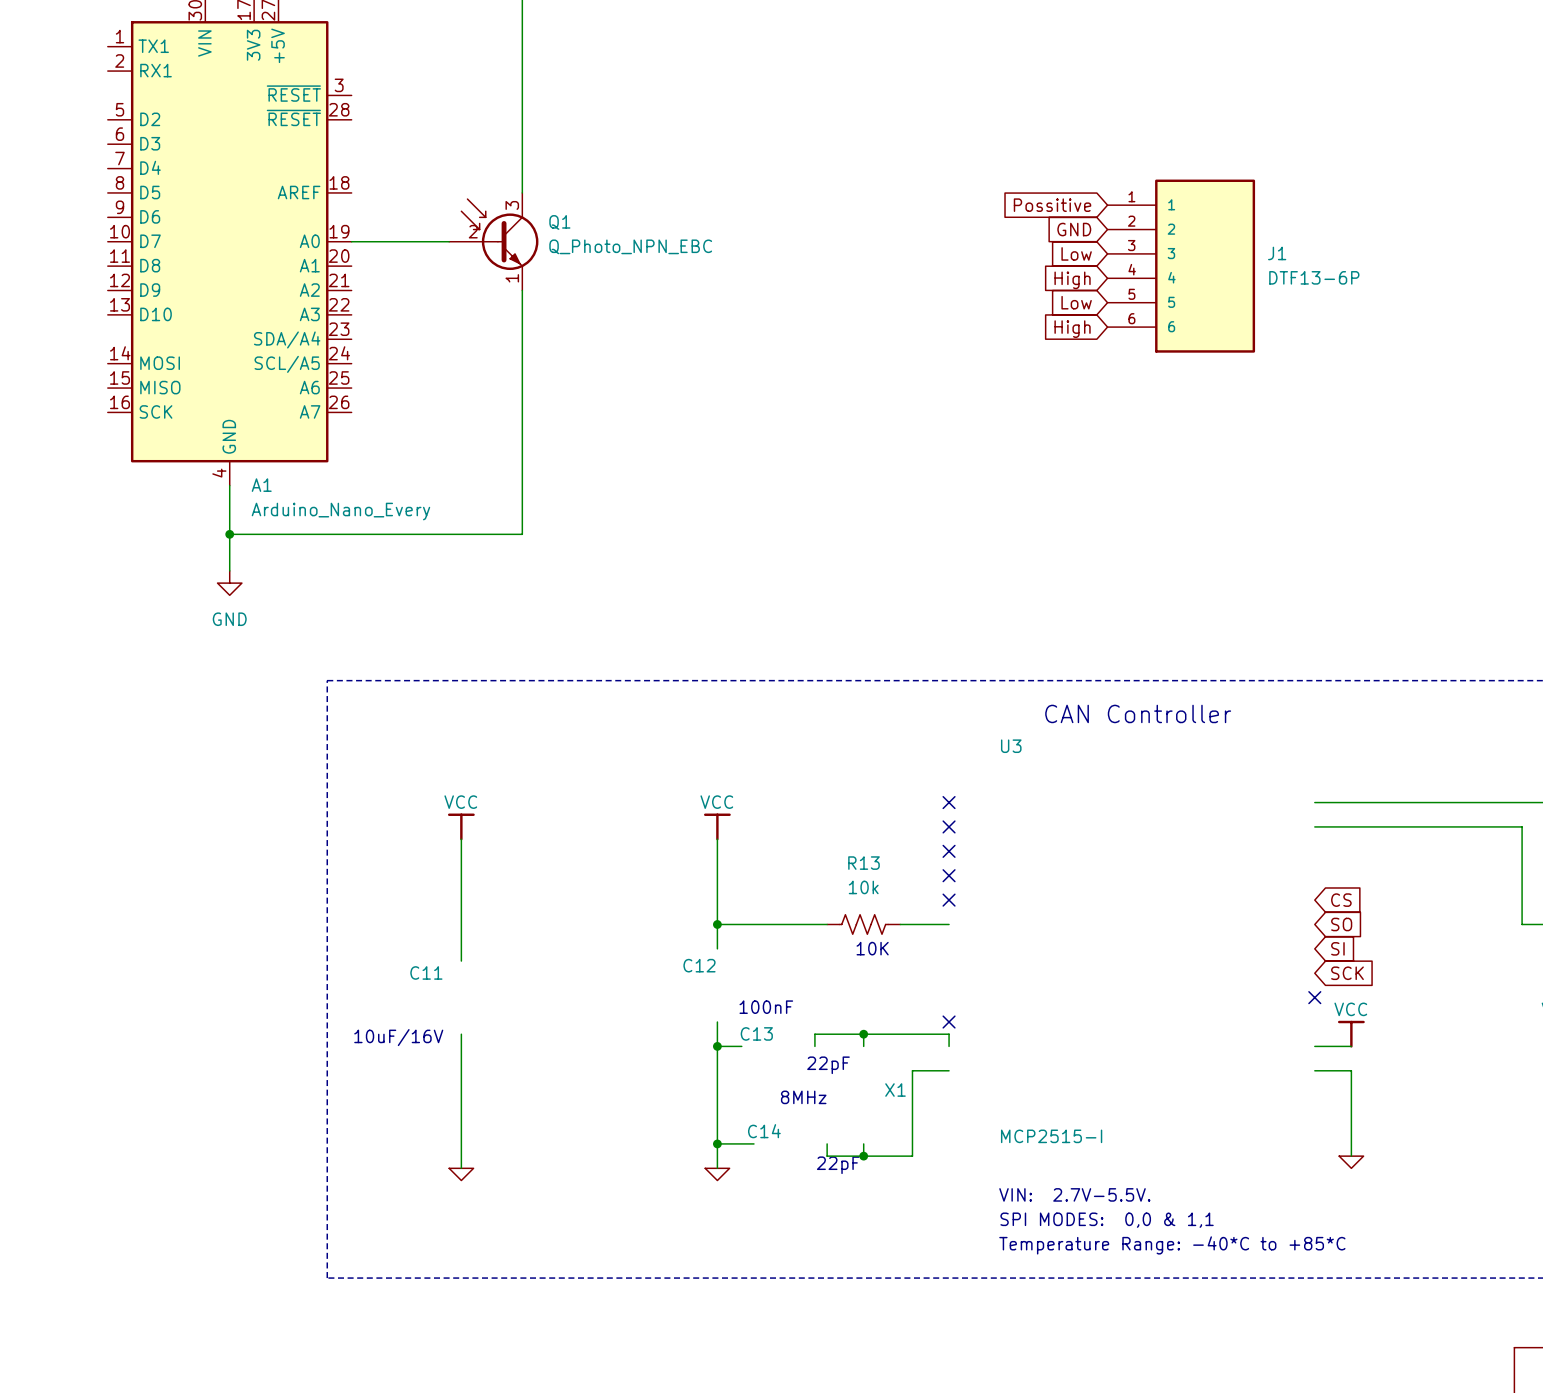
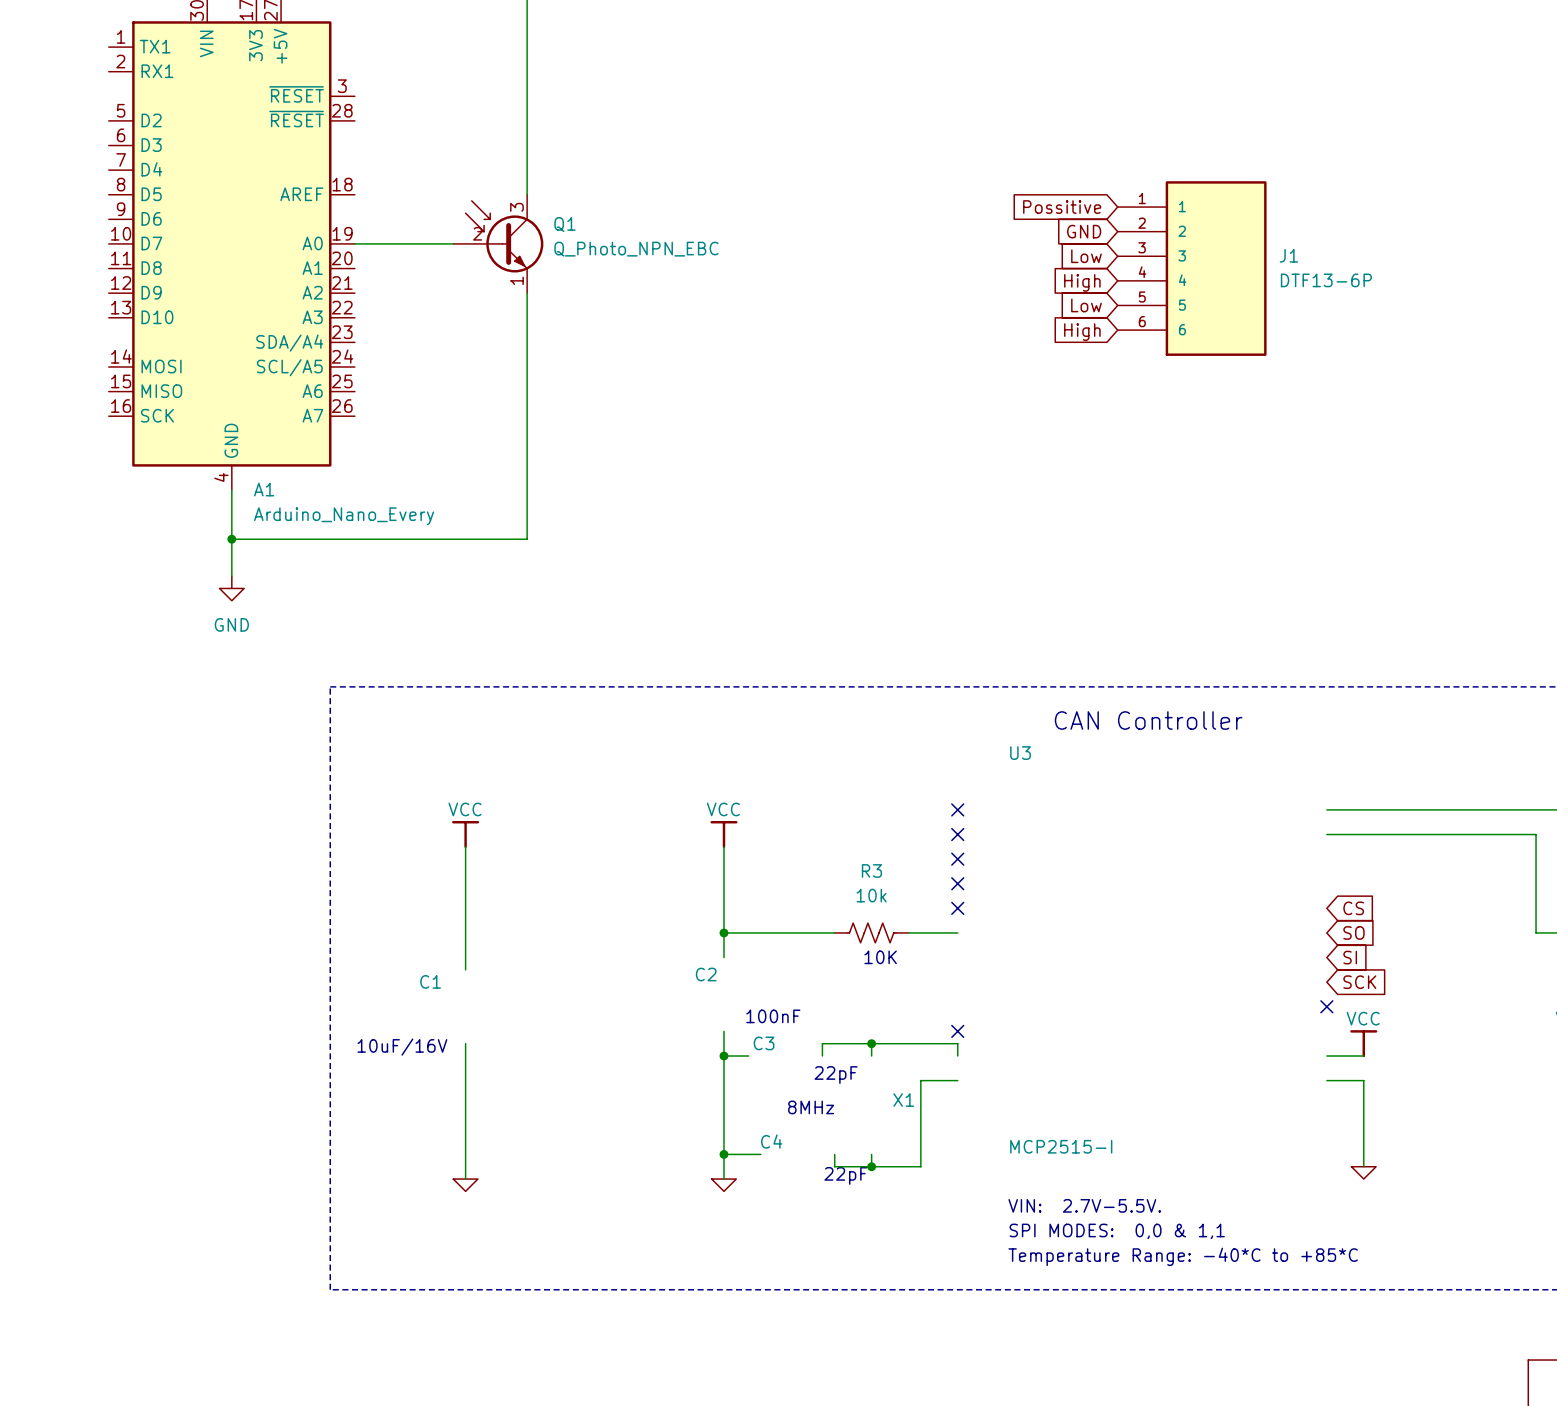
R13 name: R13 (863, 863) -> R3 (871, 870)
C12 name: C12 (699, 965) -> C2 (706, 974)
C11 name: C11 (426, 972) -> C1 (430, 981)
C13 name: C13 (756, 1033) -> C3 (764, 1043)
C14 name: C14 (764, 1131) -> C4 (771, 1141)

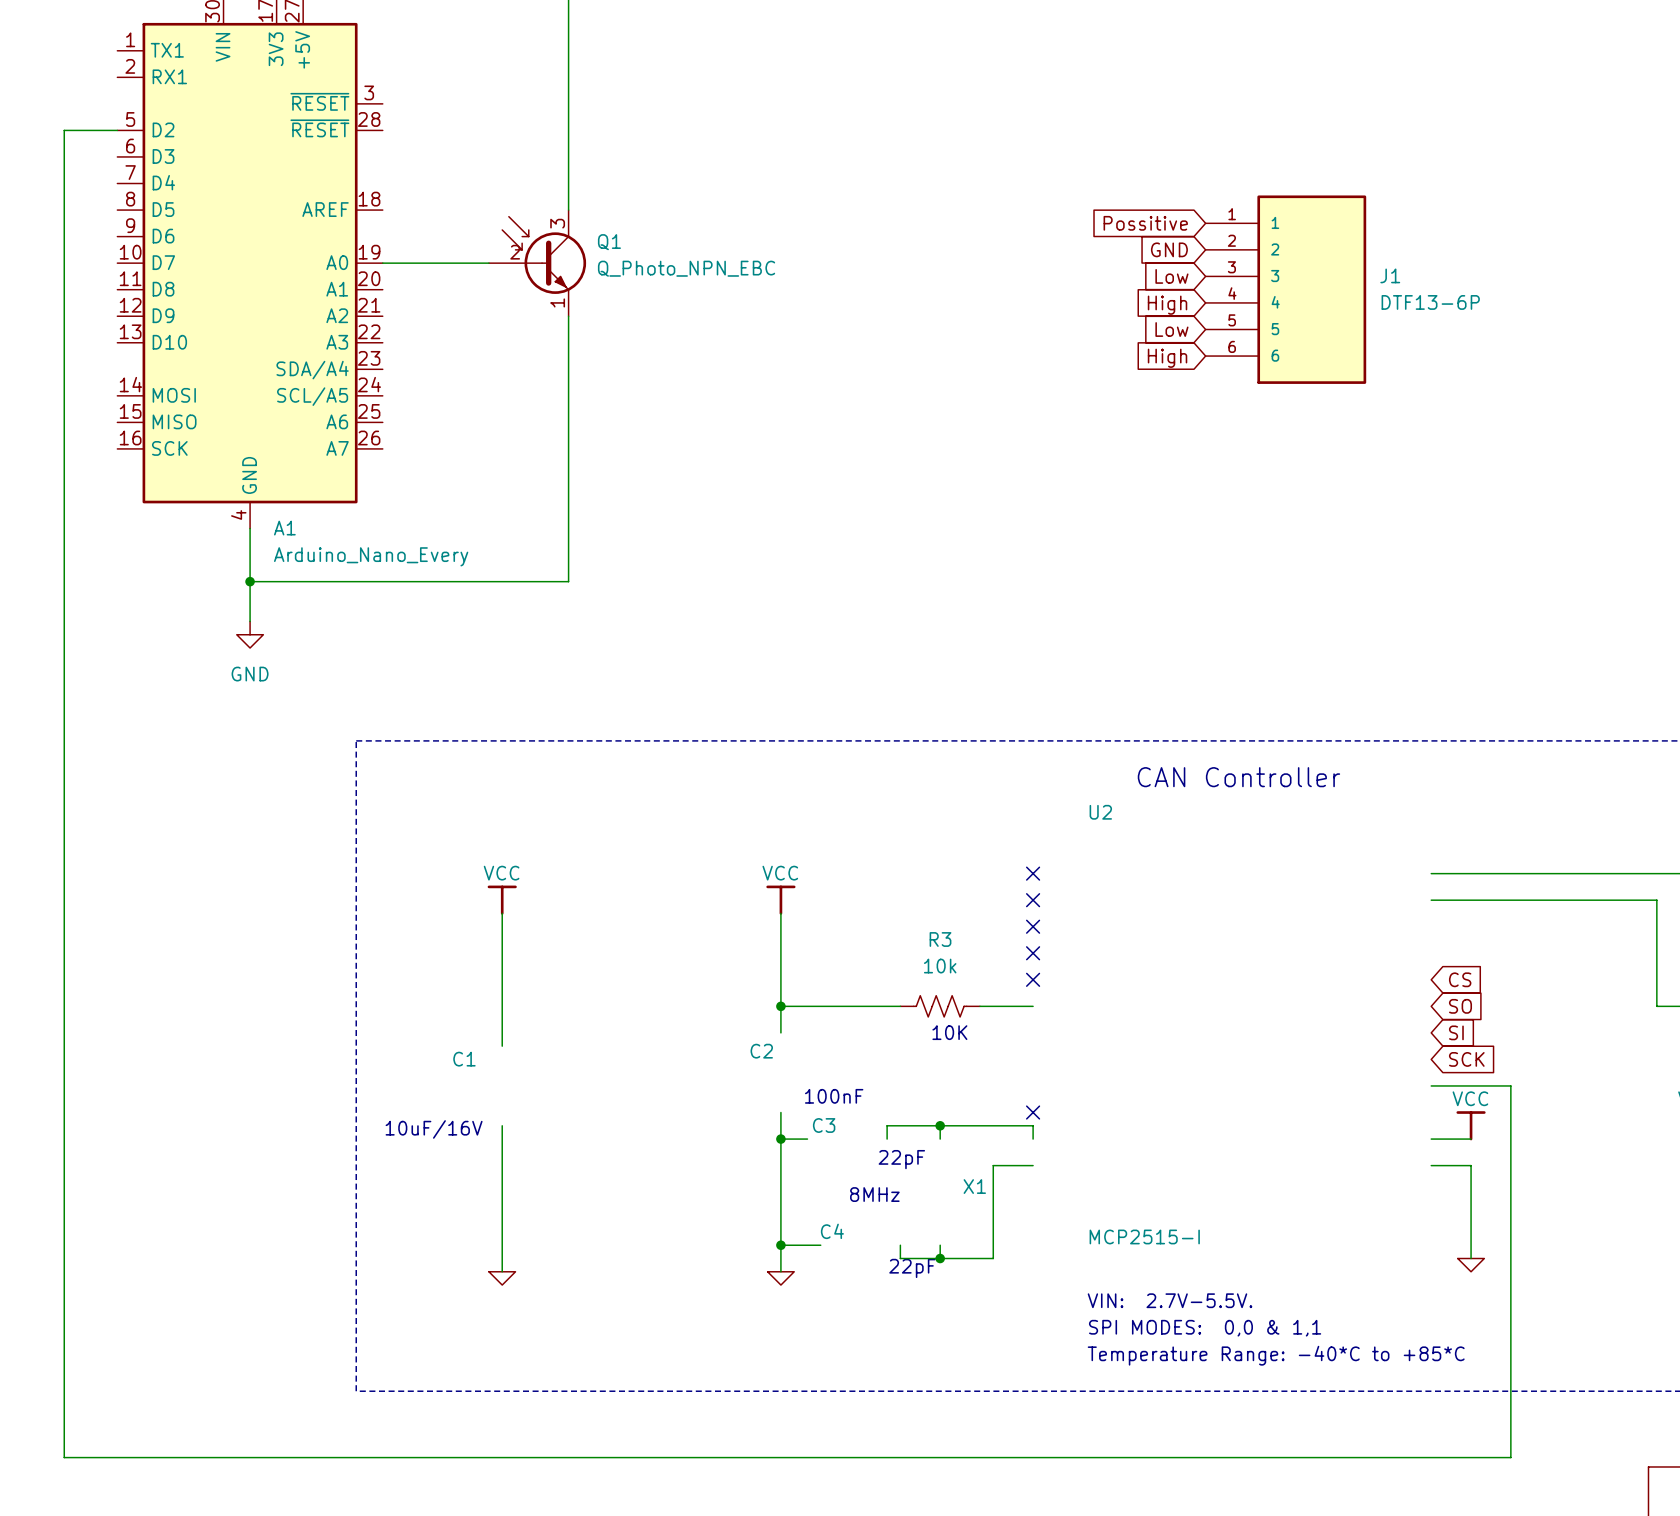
wire: none -> (117, 130) (64, 130) (64, 1457) (1510, 1457) (1510, 1085) (1431, 1085)
U3 name: U3 (1020, 753) -> U2 (1100, 812)
no-connect mark: (1326, 1006) -> none

